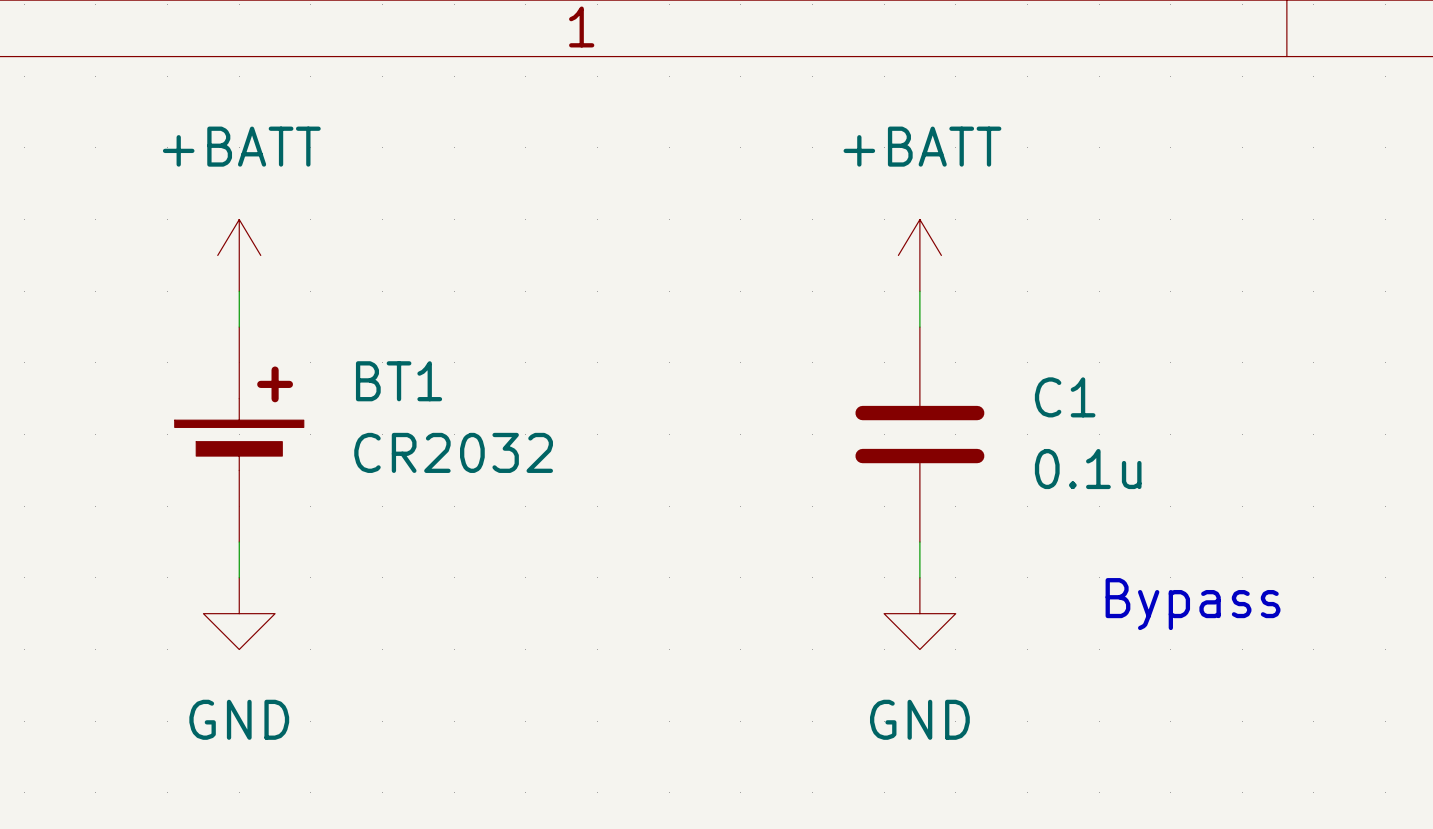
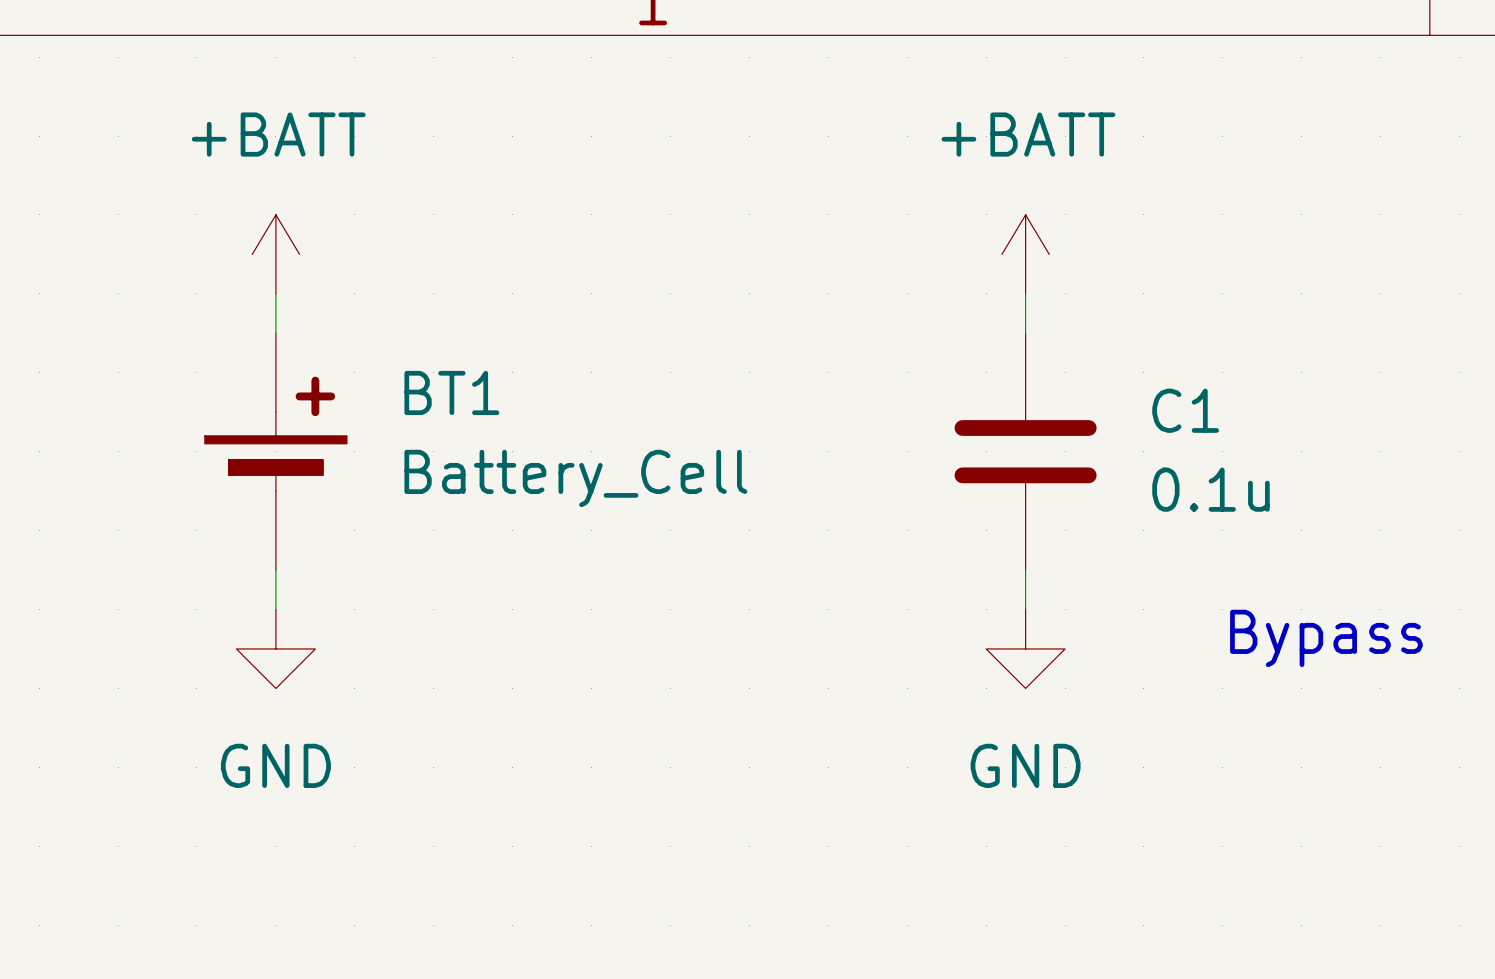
BT1 value: CR2032 (453, 452) -> Battery_Cell (575, 478)

